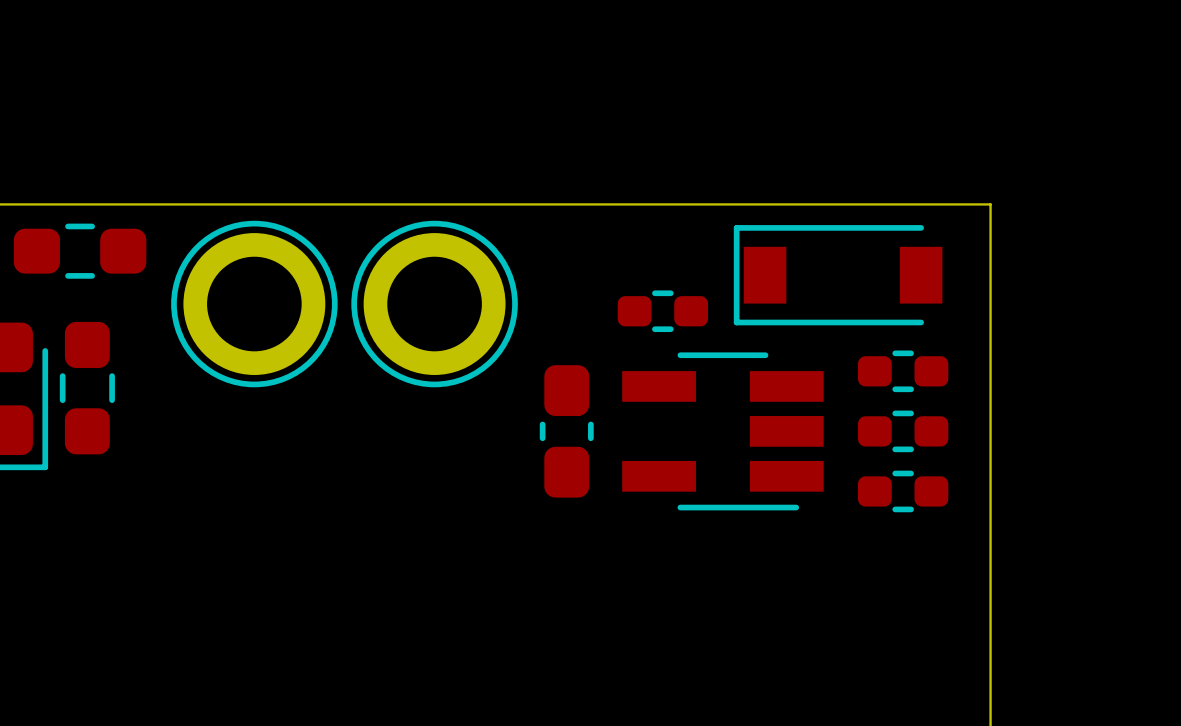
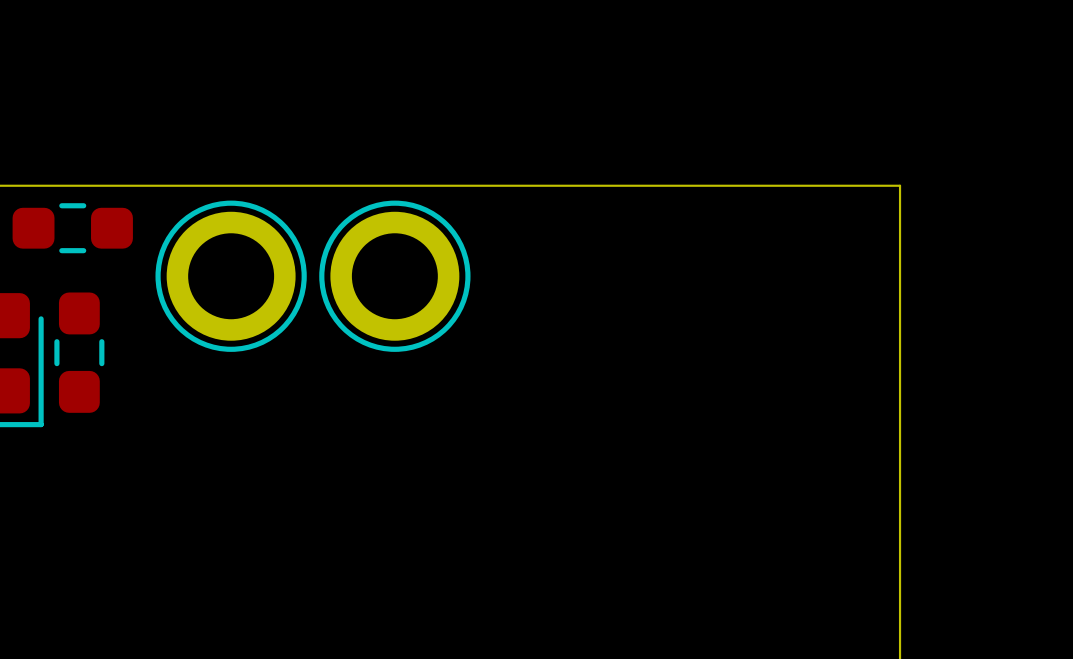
part: (838, 275) -> none
part: (662, 311) -> none
part: (903, 371) -> none
part: (566, 431) -> none
part: (722, 431) -> none
part: (903, 431) -> none
part: (903, 491) -> none

